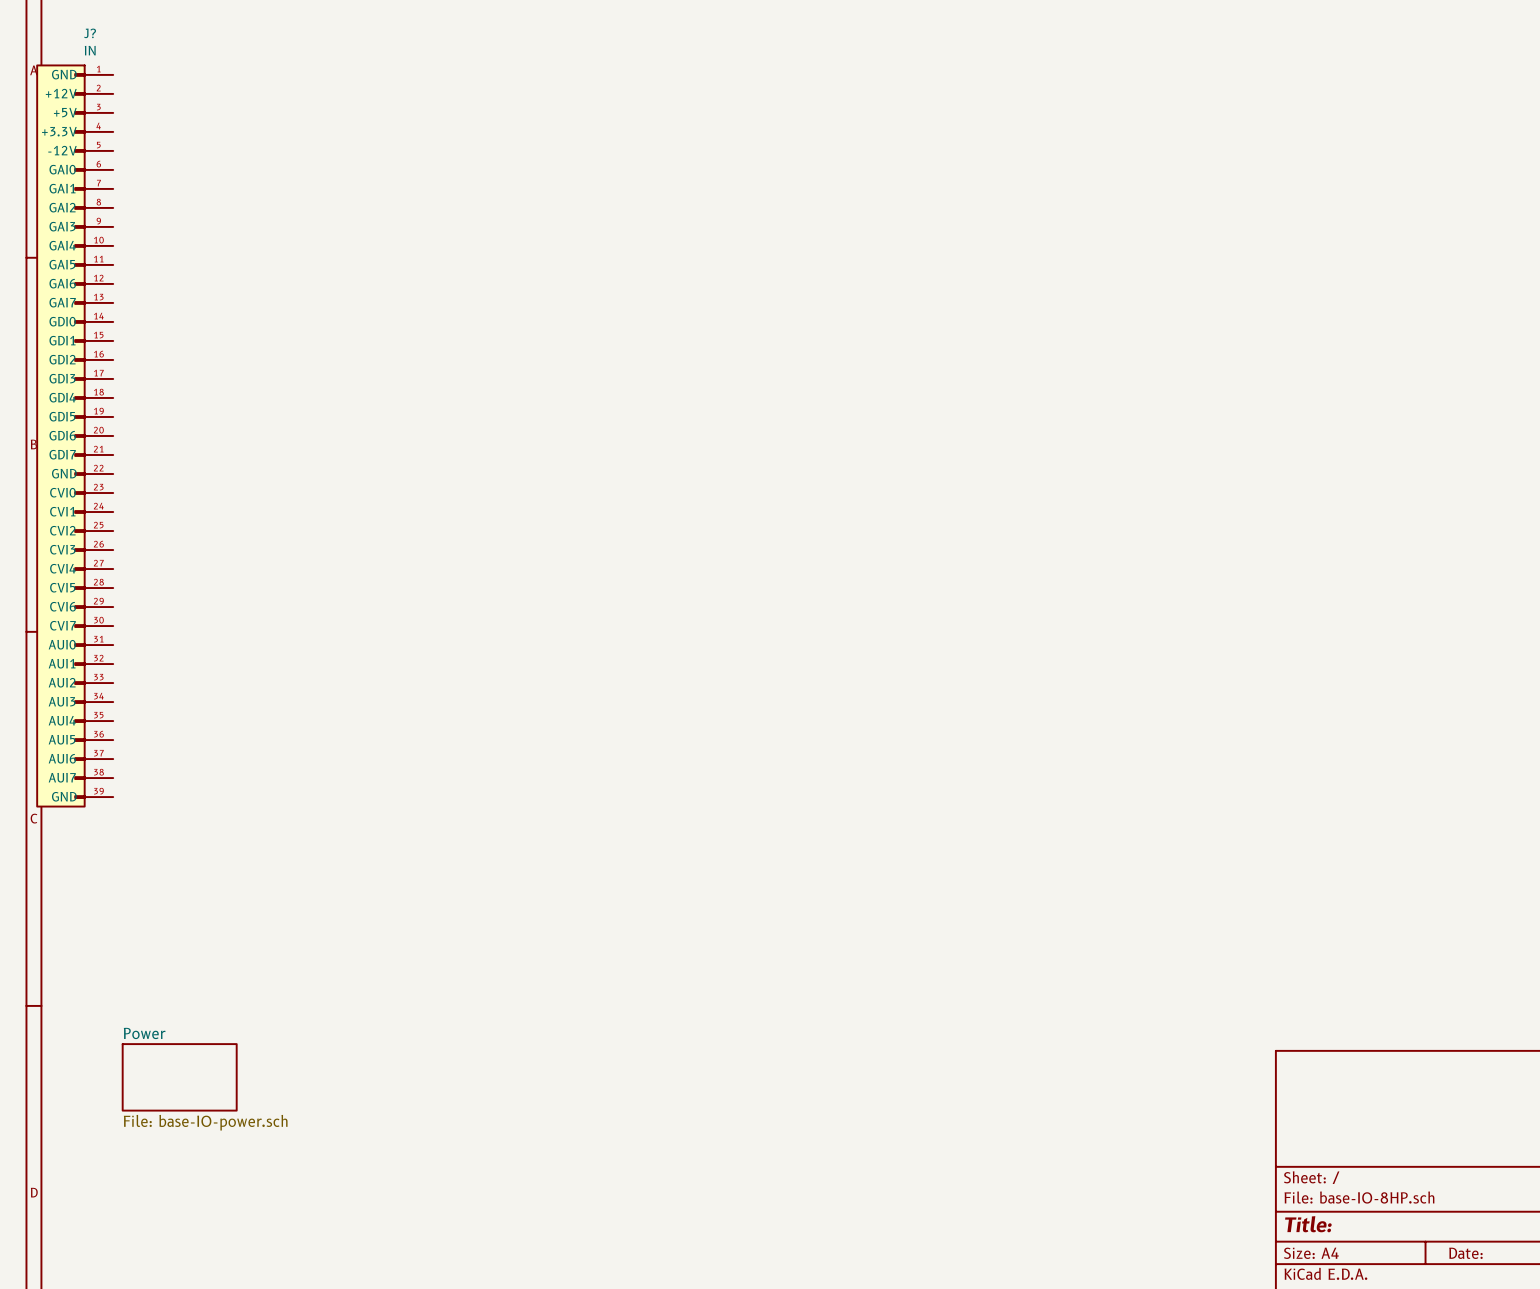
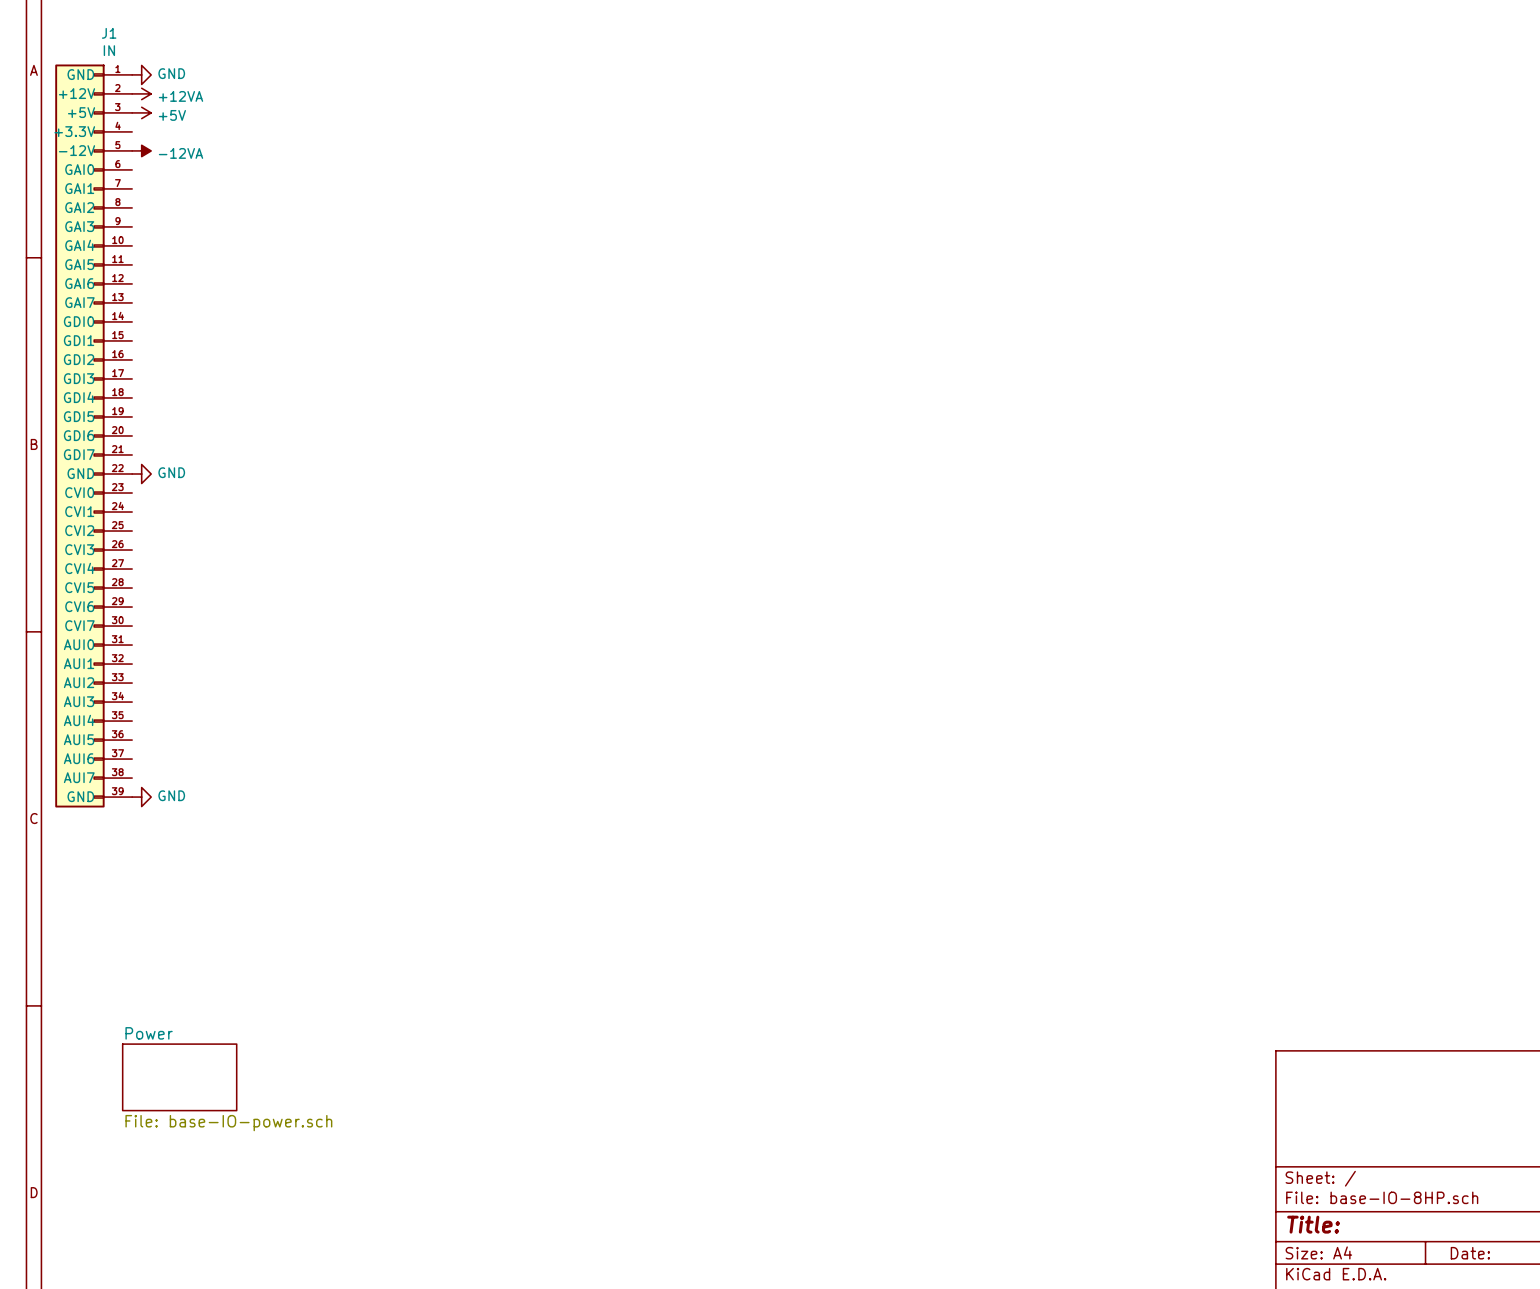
power symbol: none -> GND (141, 74)
power symbol: none -> +12VA (141, 93)
power symbol: none -> +5V (141, 112)
power symbol: none -> -12VA (141, 150)
J?: IN (74, 435) -> none
J1: none -> IN (93, 435)
power symbol: none -> GND (141, 474)
power symbol: none -> GND (141, 797)

